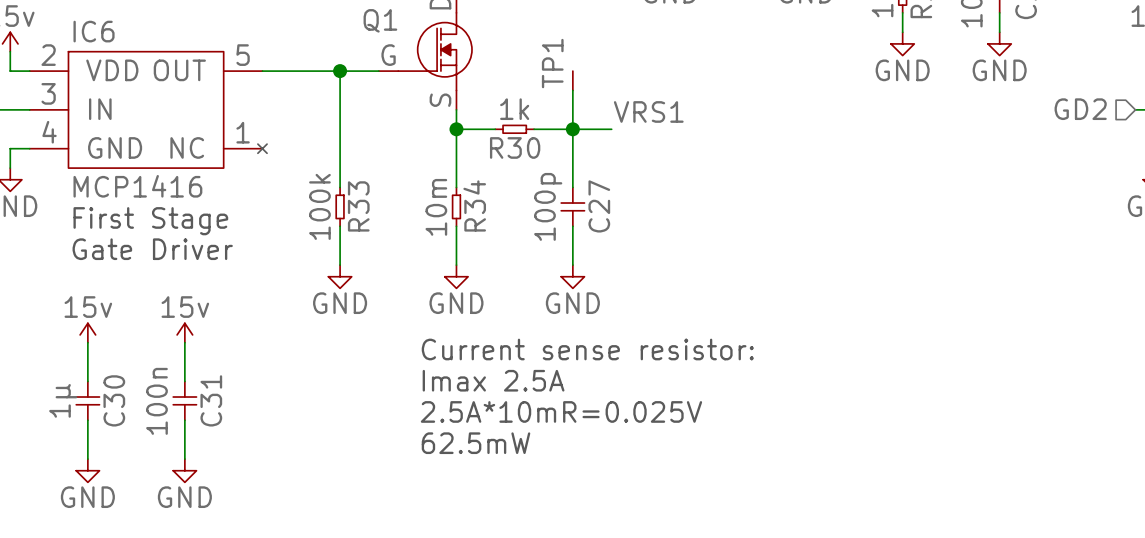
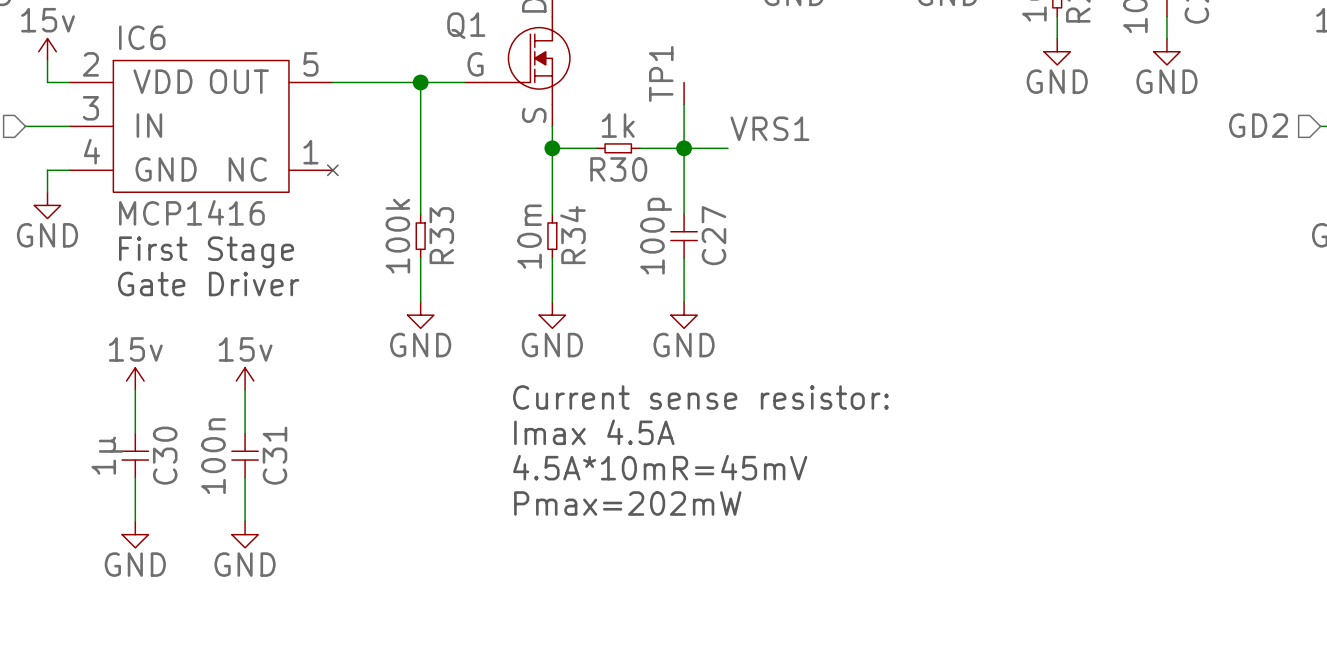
text: Imax 2.5A (493, 380) -> Imax 4.5A (594, 432)
text: 2.5A*10mR=0.025V (561, 411) -> 4.5A*10mR=45mV (660, 467)
text: 62.5mW (476, 443) -> Pmax=202mW (627, 503)

